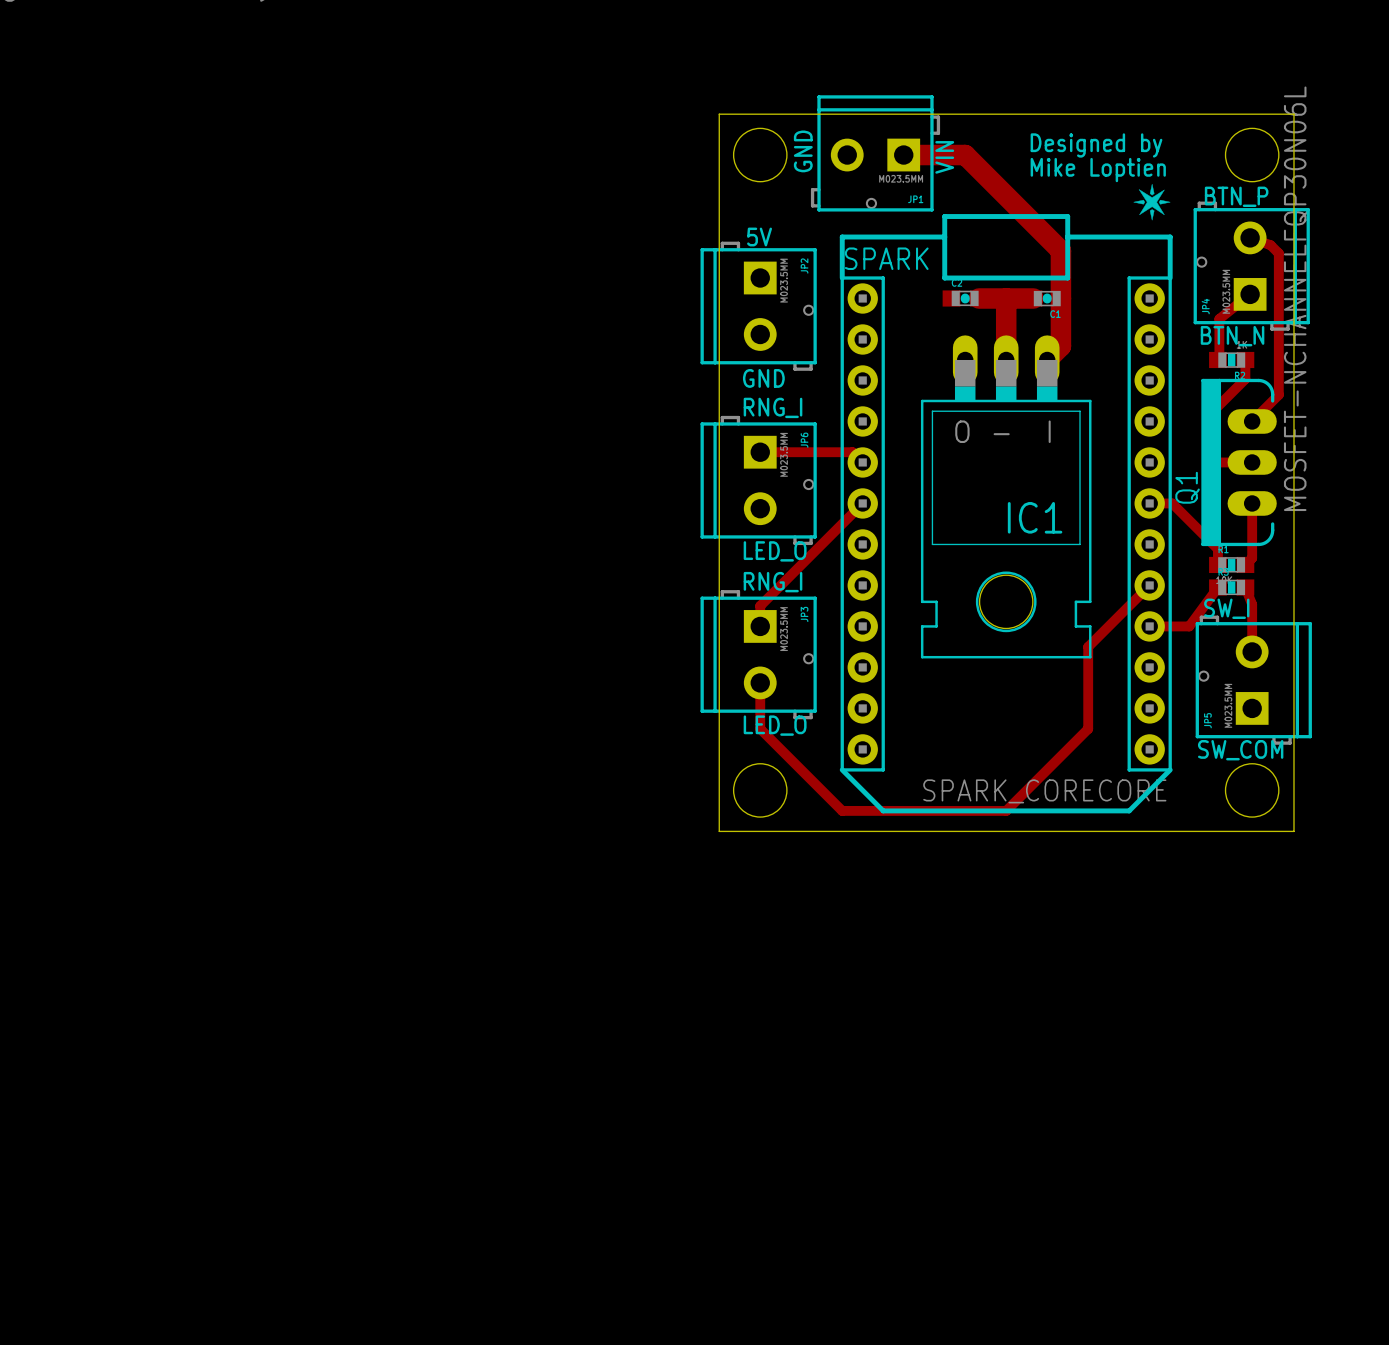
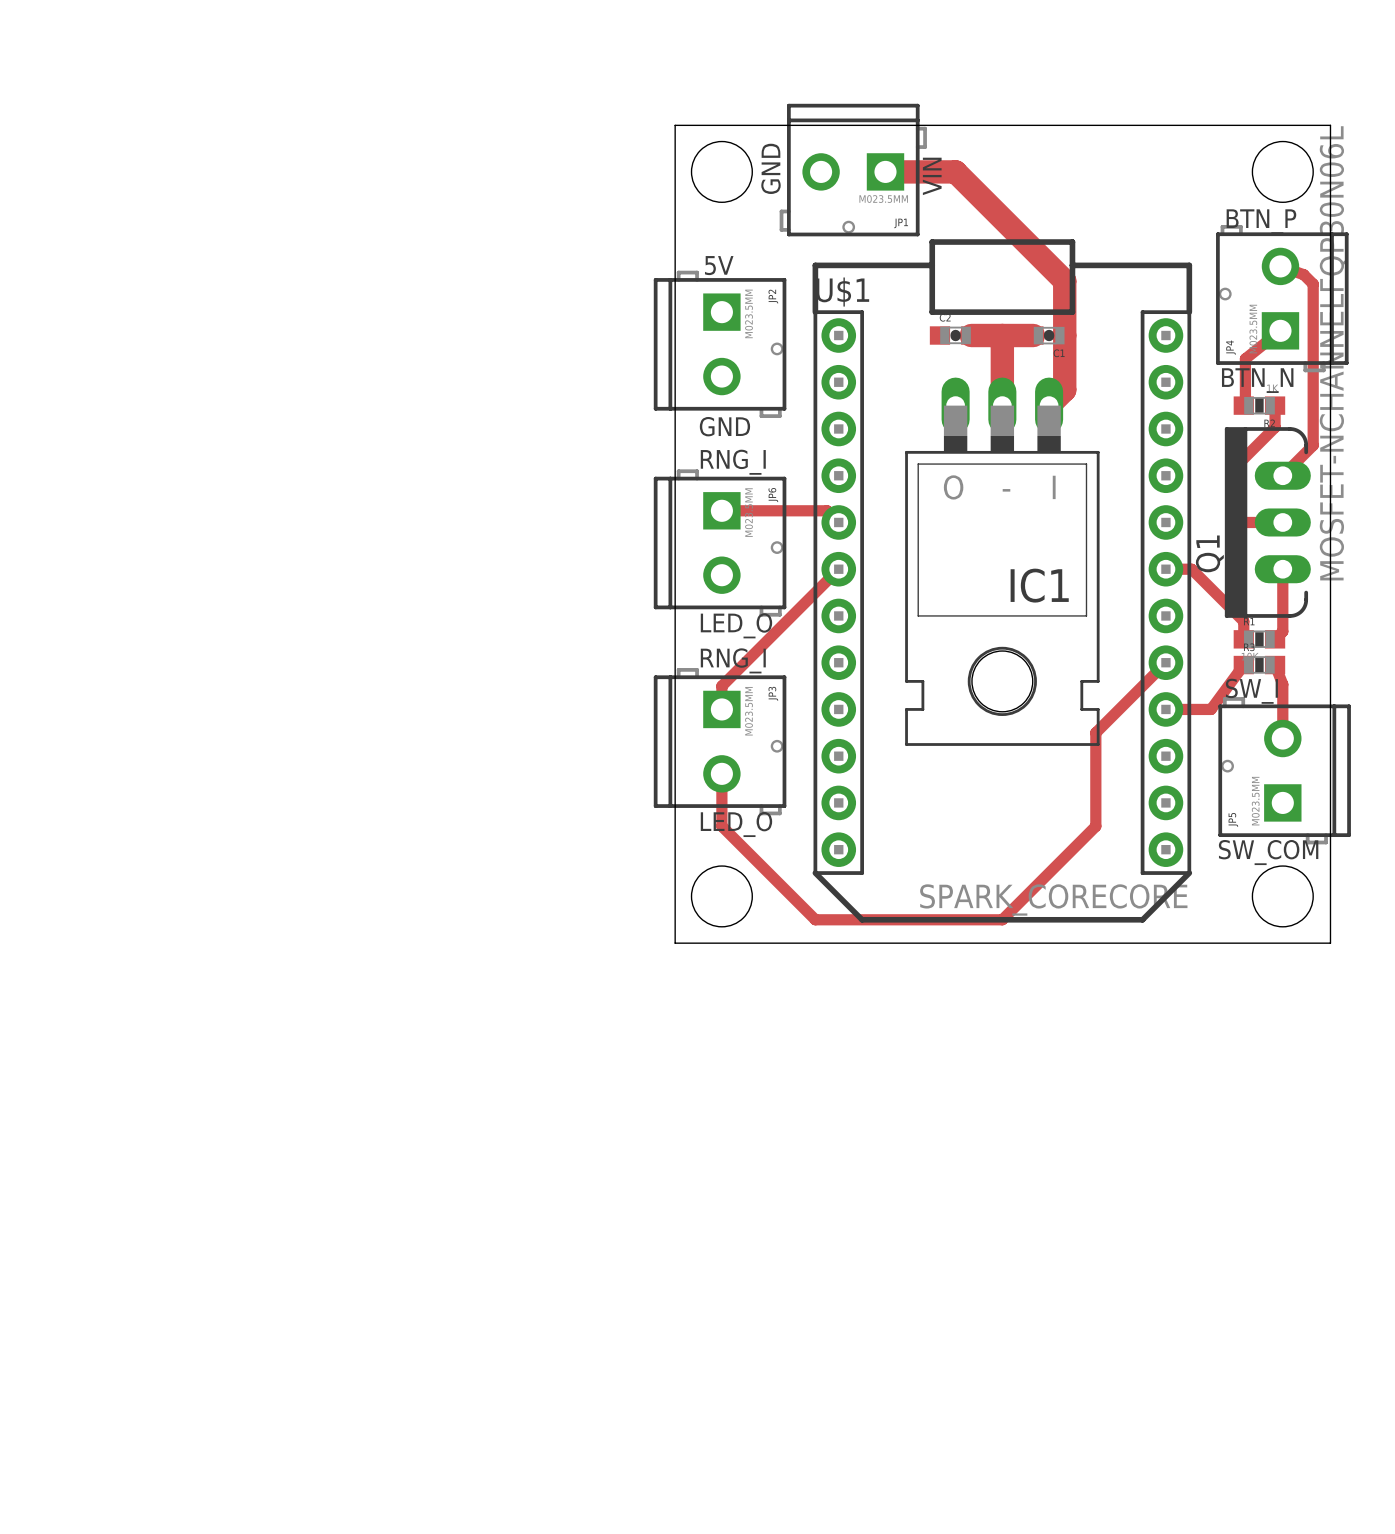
text: Designed by (1096, 145) -> none
text: Mike Loptien (1098, 170) -> none
drawing: [1133, 183, 1171, 221] -> none
SPARK name: SPARK (886, 258) -> U$1 (842, 292)

